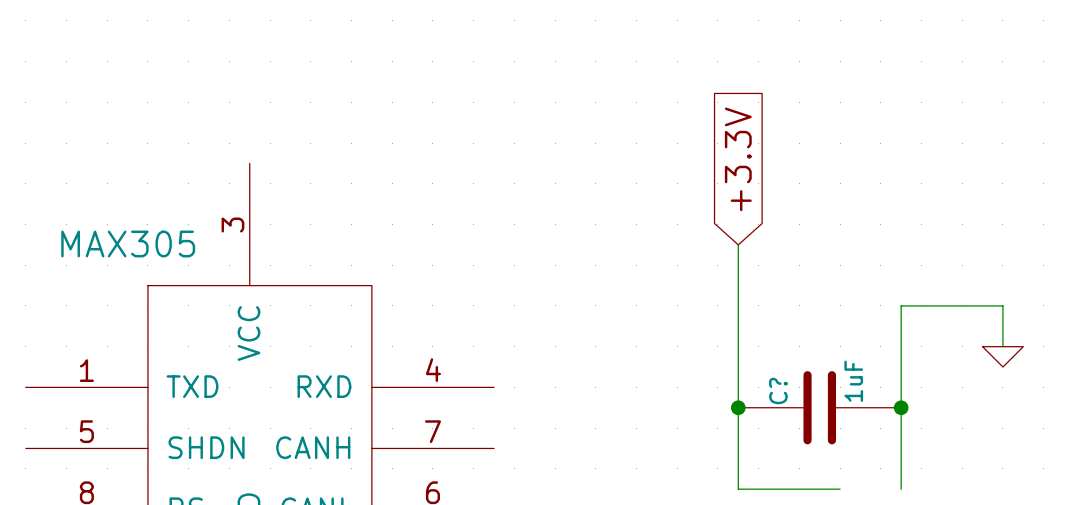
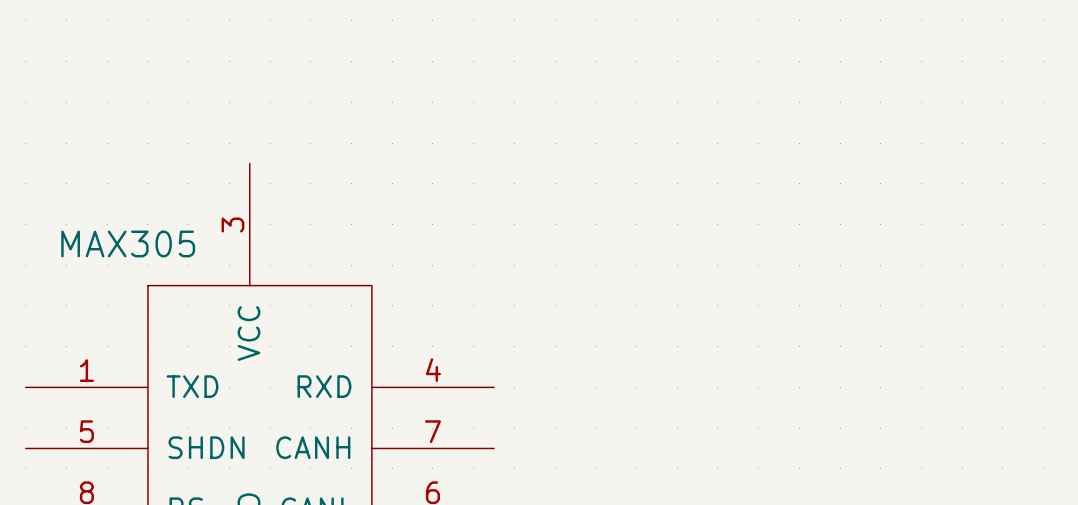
global label: +3.3V (738, 159) -> none
wire: (738, 244) (738, 489) (840, 489) -> none
wire: (1002, 346) (1002, 305) (901, 305) (901, 489) -> none
power symbol: (1002, 356) -> none
junction: (738, 407) -> none
C?: 1uF (819, 407) -> none
junction: (901, 407) -> none

